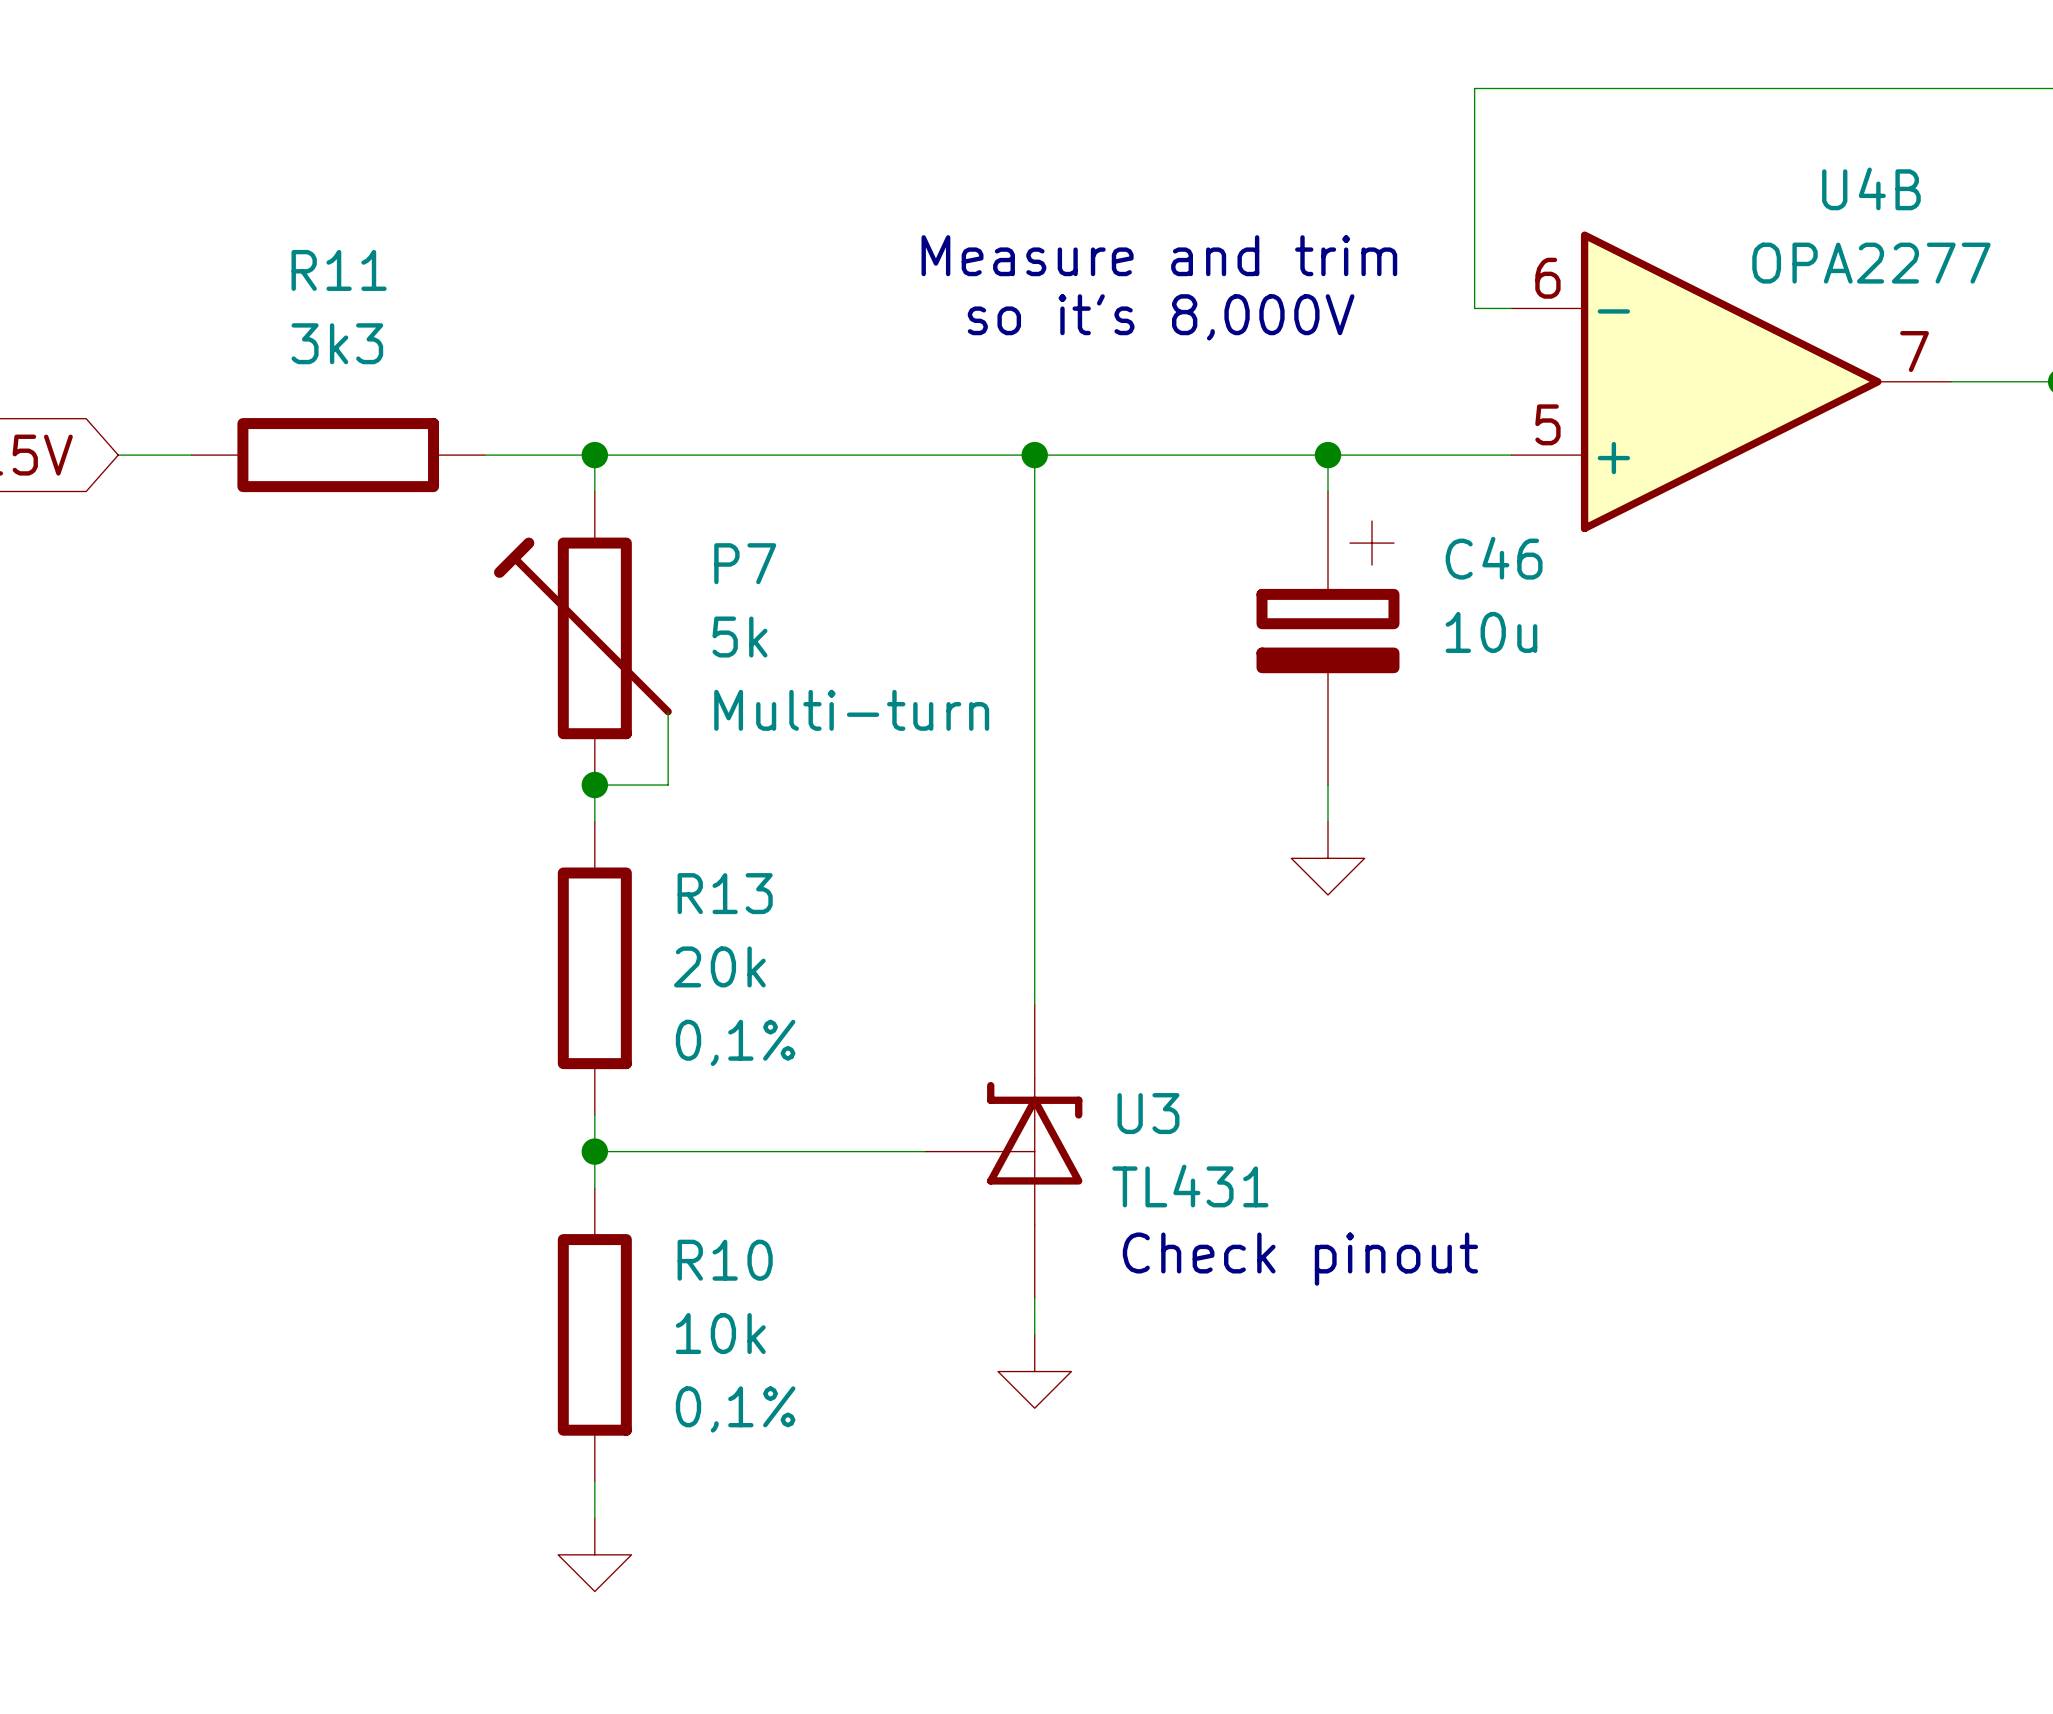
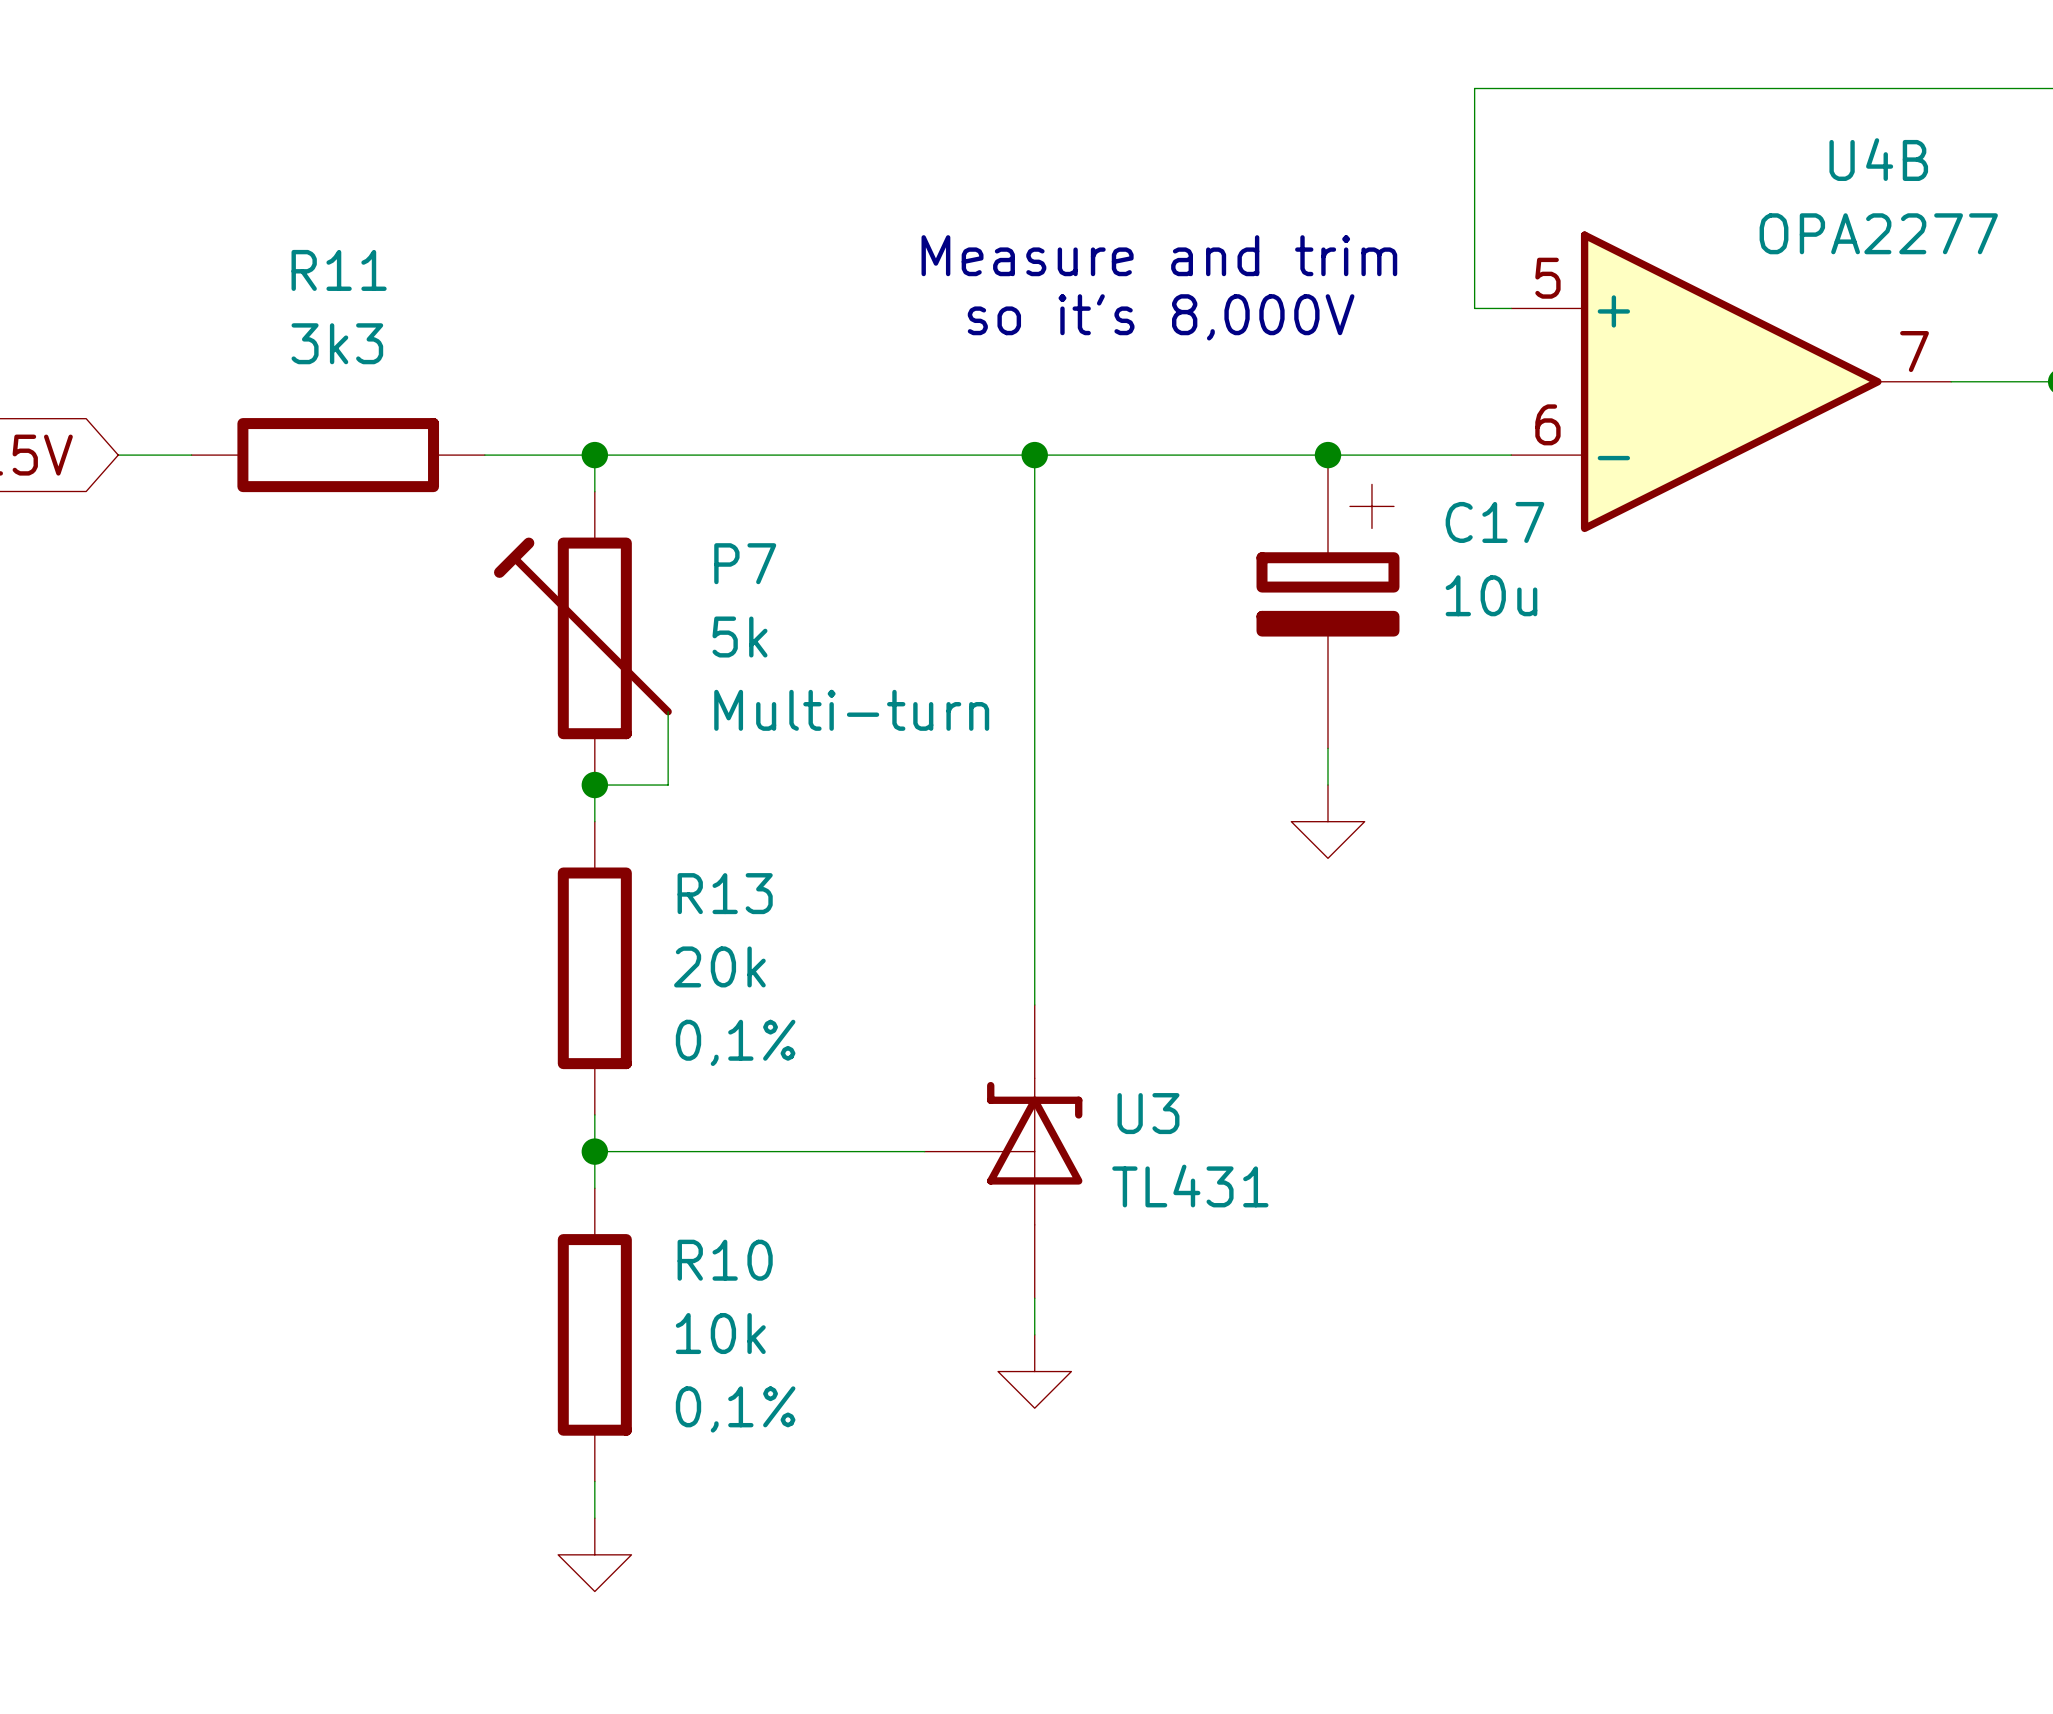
U4B flip: as is (1731, 381) -> up-down (1731, 381)
C17: none -> 10u (1327, 601)
C46: 10u (1327, 638) -> none
power symbol position: (1327, 858) -> (1327, 821)
text: Check pinout (1300, 1259) -> none

